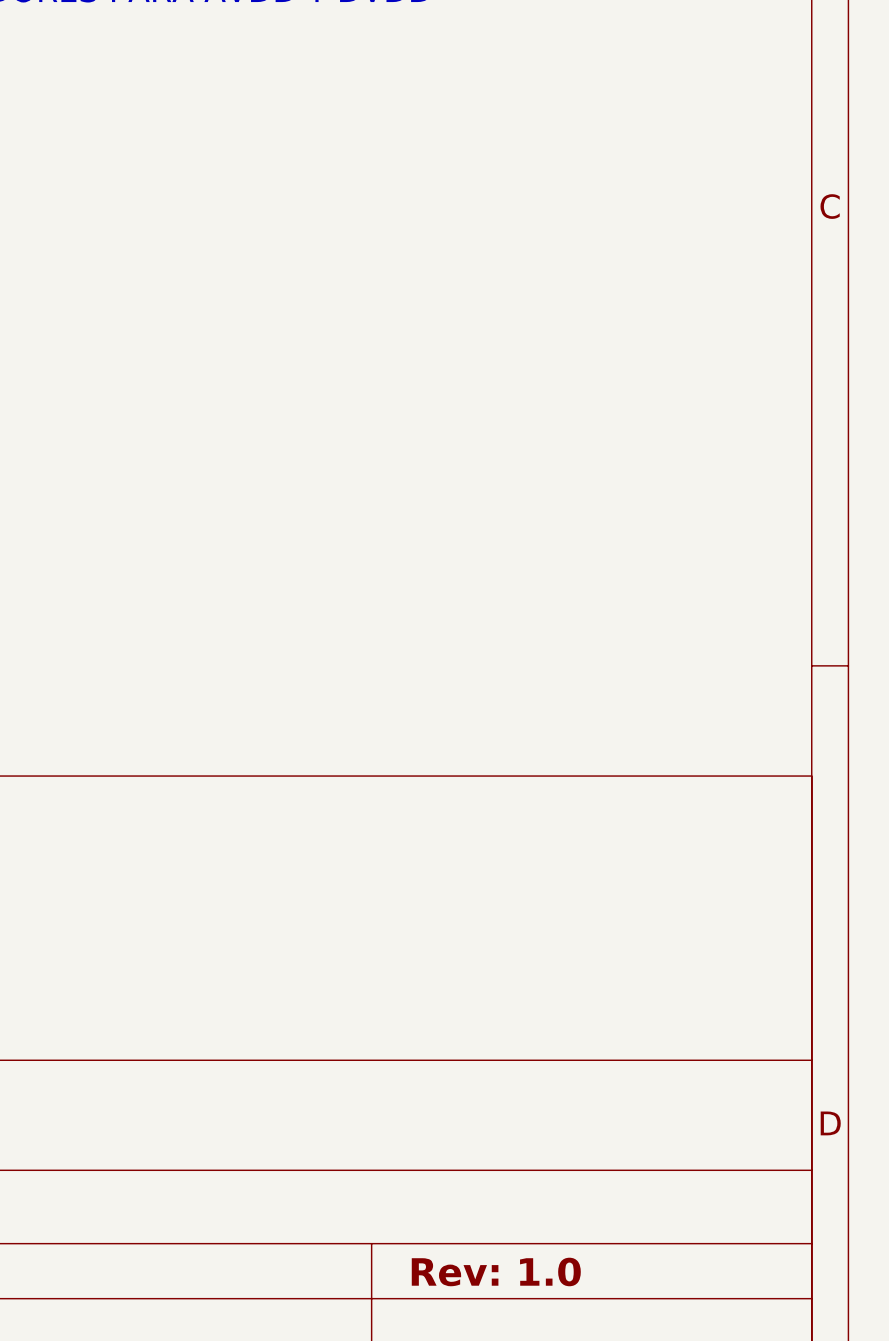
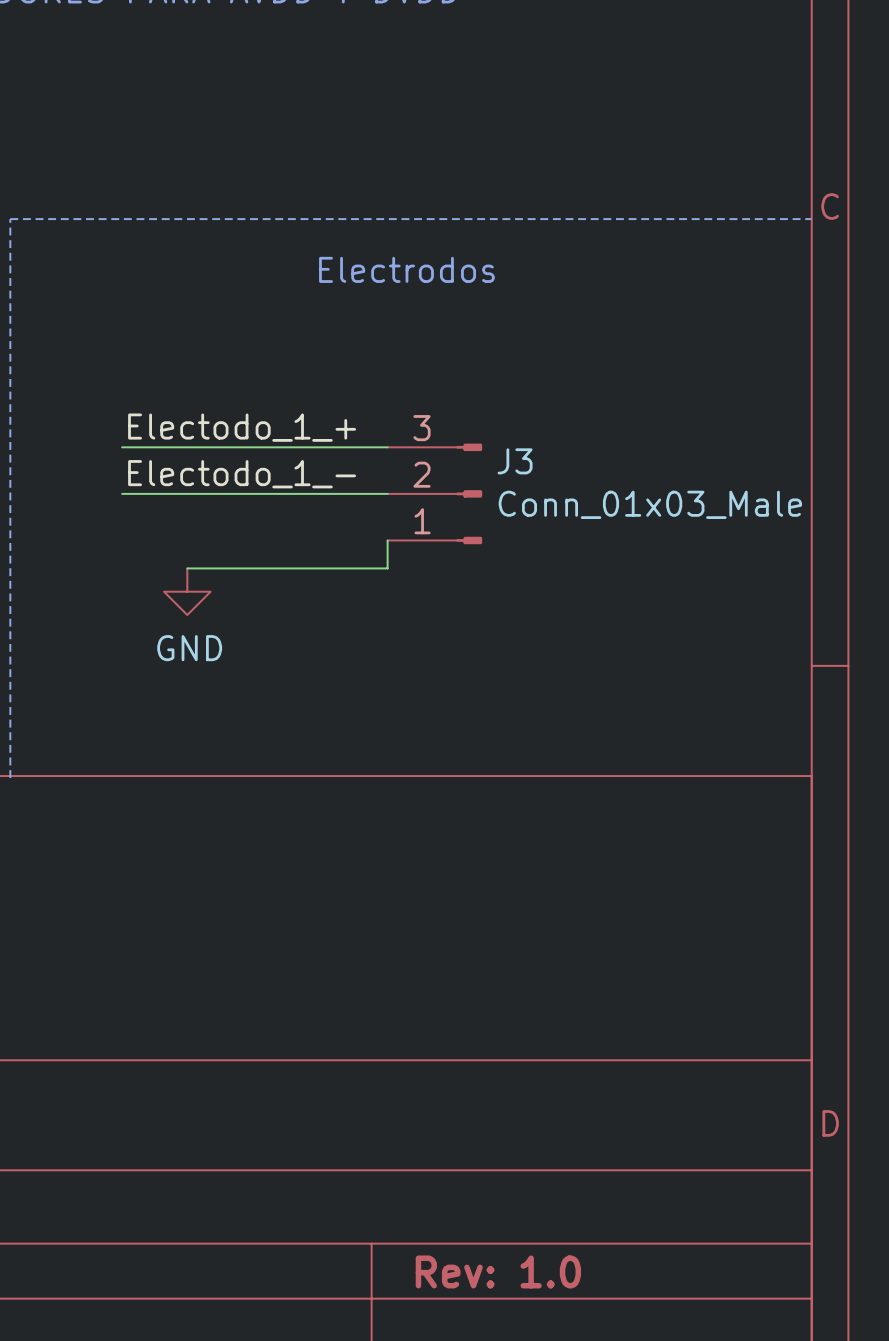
line: none -> (811, 219) (10, 219) (10, 778)
text: none -> Electrodos (406, 269)
label: none -> Electodo_1_+ (242, 427)
wire: none -> (122, 447) (387, 447)
label: none -> Electodo_1_- (242, 474)
wire: none -> (122, 493) (387, 493)
J3: none -> Conn_01x03_Male (434, 493)
wire: none -> (387, 540) (387, 568) (187, 568)
power symbol: none -> GND (187, 591)

